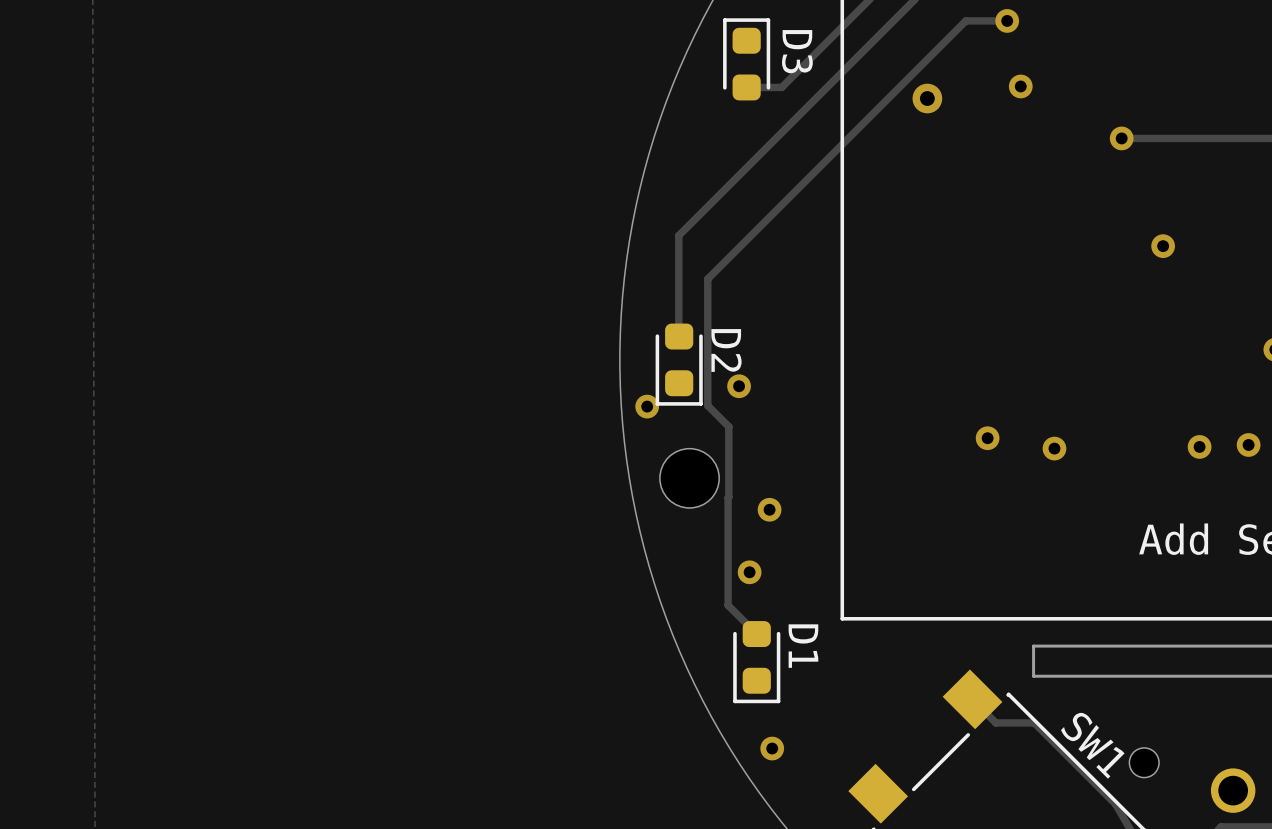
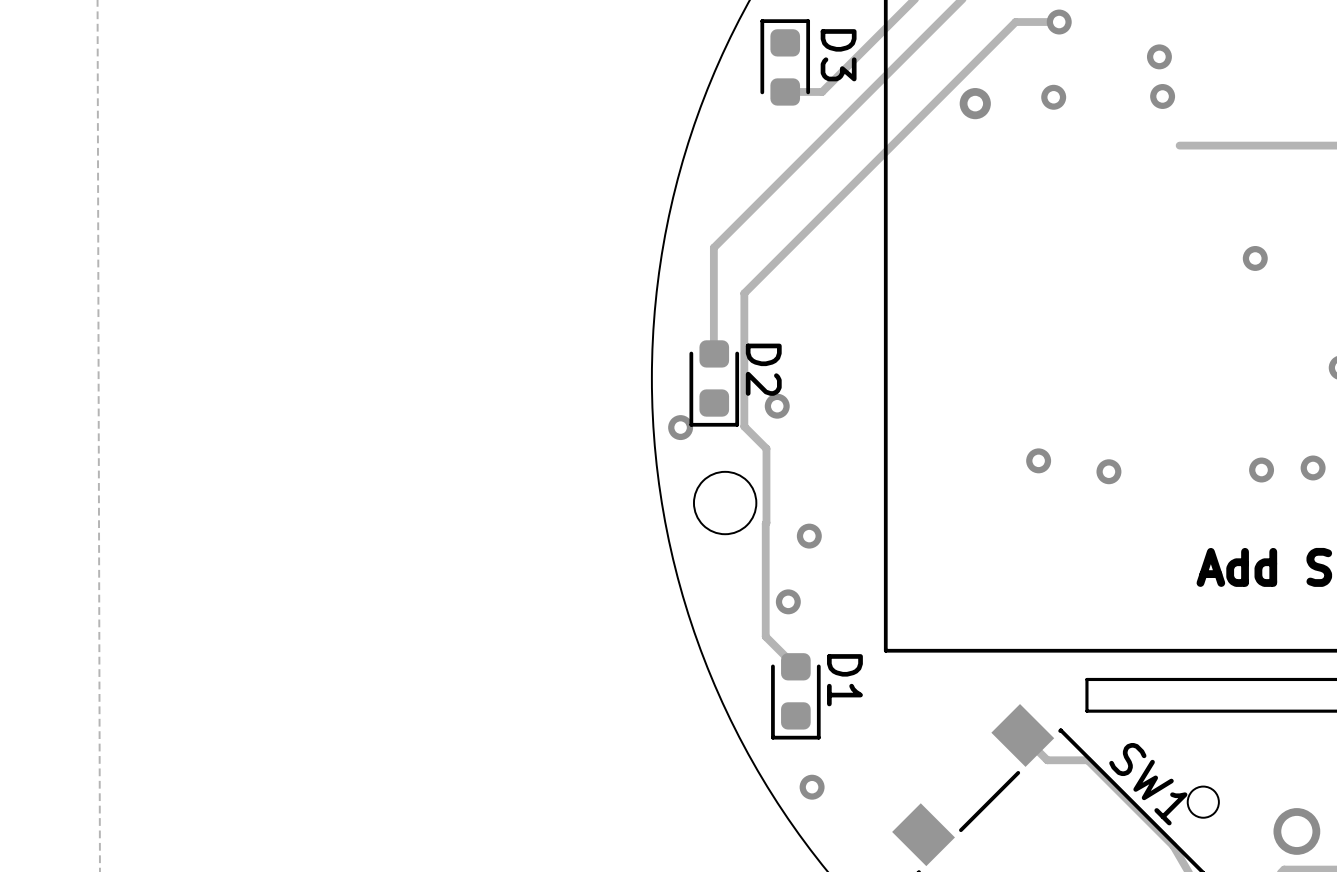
via: none -> (1159, 56)
via position: (1020, 86) -> (1053, 97)
via: none -> (1162, 96)
via: (1121, 138) -> none
via position: (1163, 246) -> (1255, 258)

